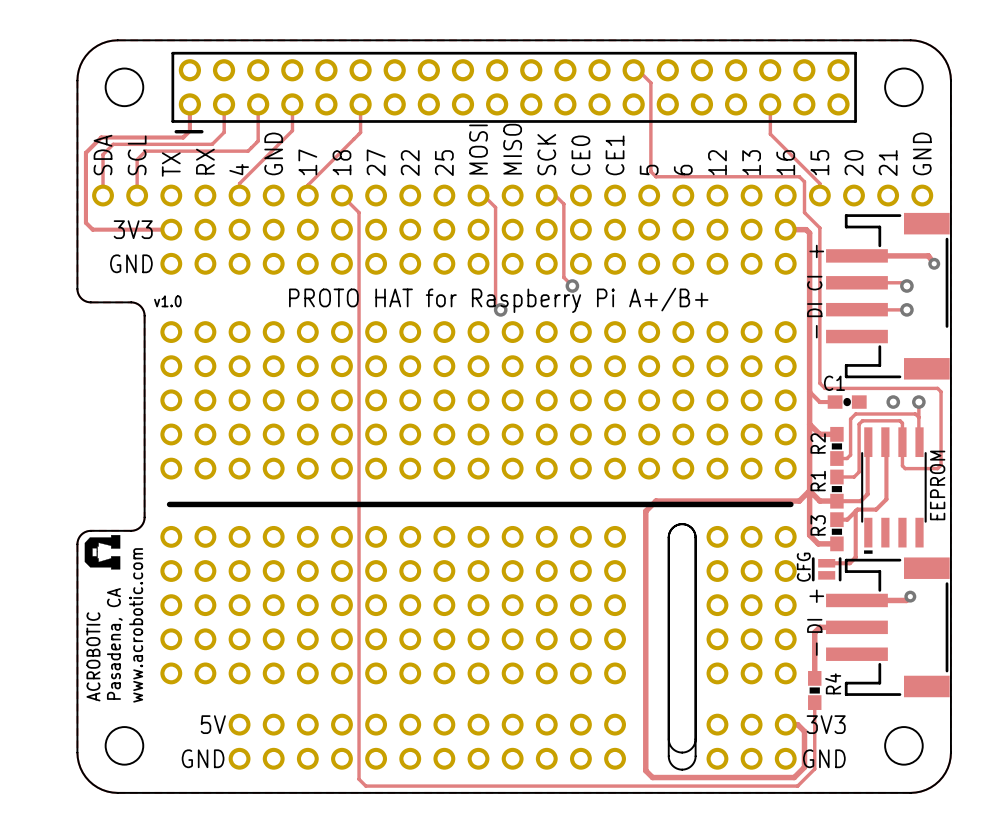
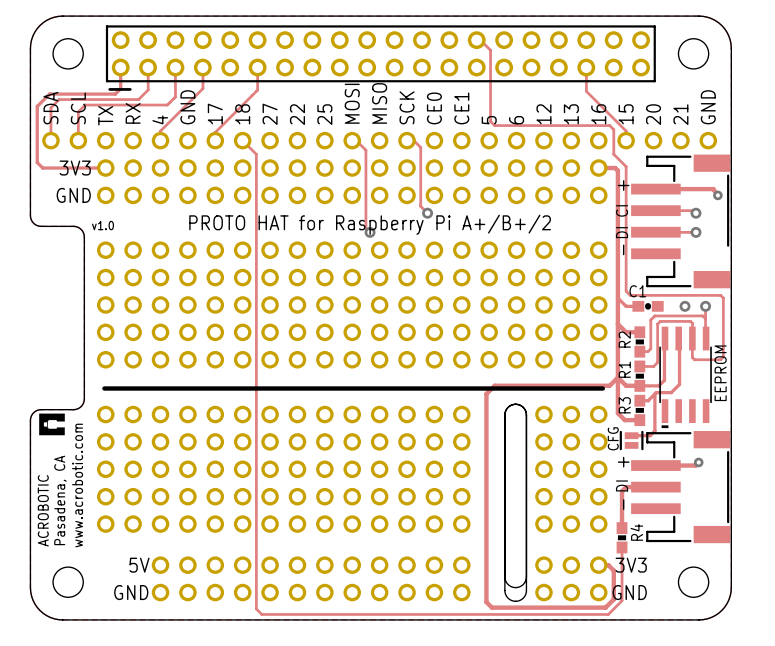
text: PROTO HAT for Raspberry Pi A+/B+ (498, 300) -> PROTO HAT for Raspberry Pi A+/B+/2 (370, 224)
drawing shape: [84, 535, 121, 570] -> [39, 413, 65, 436]

